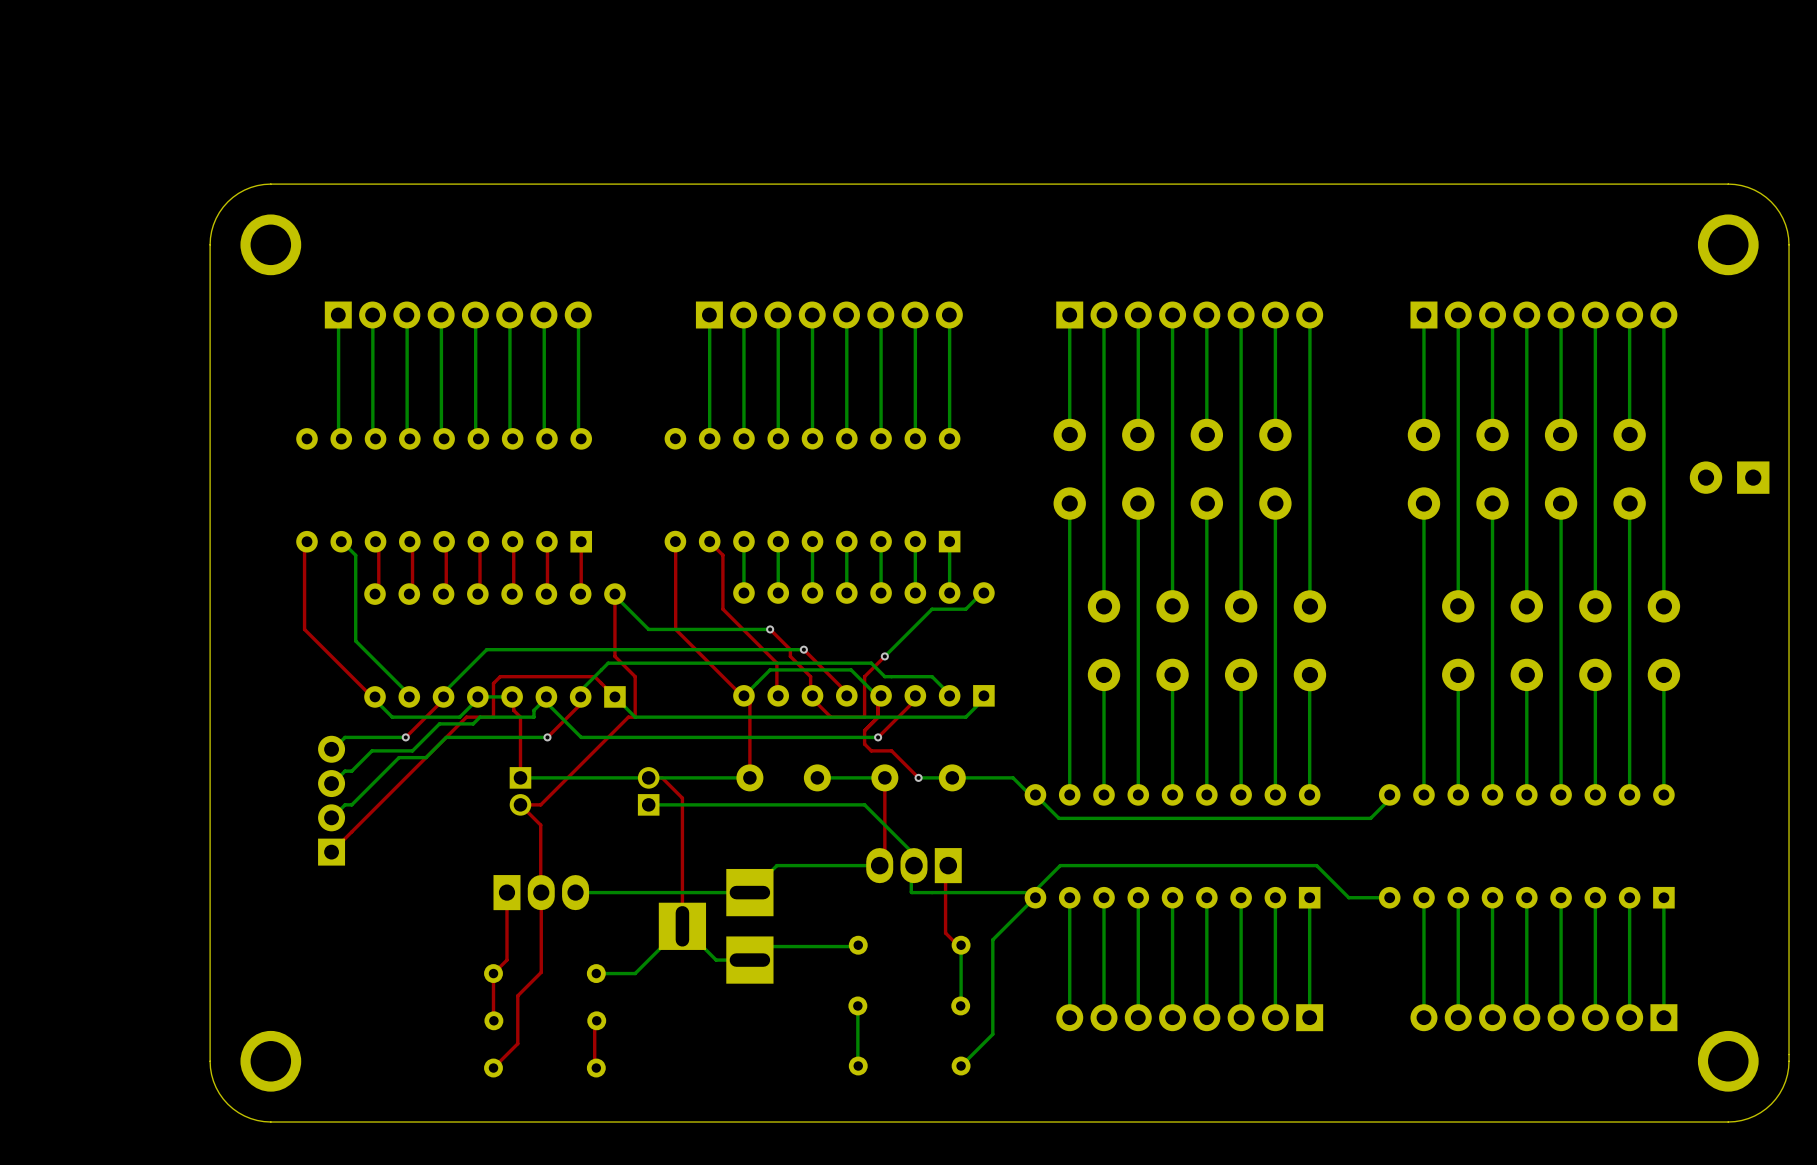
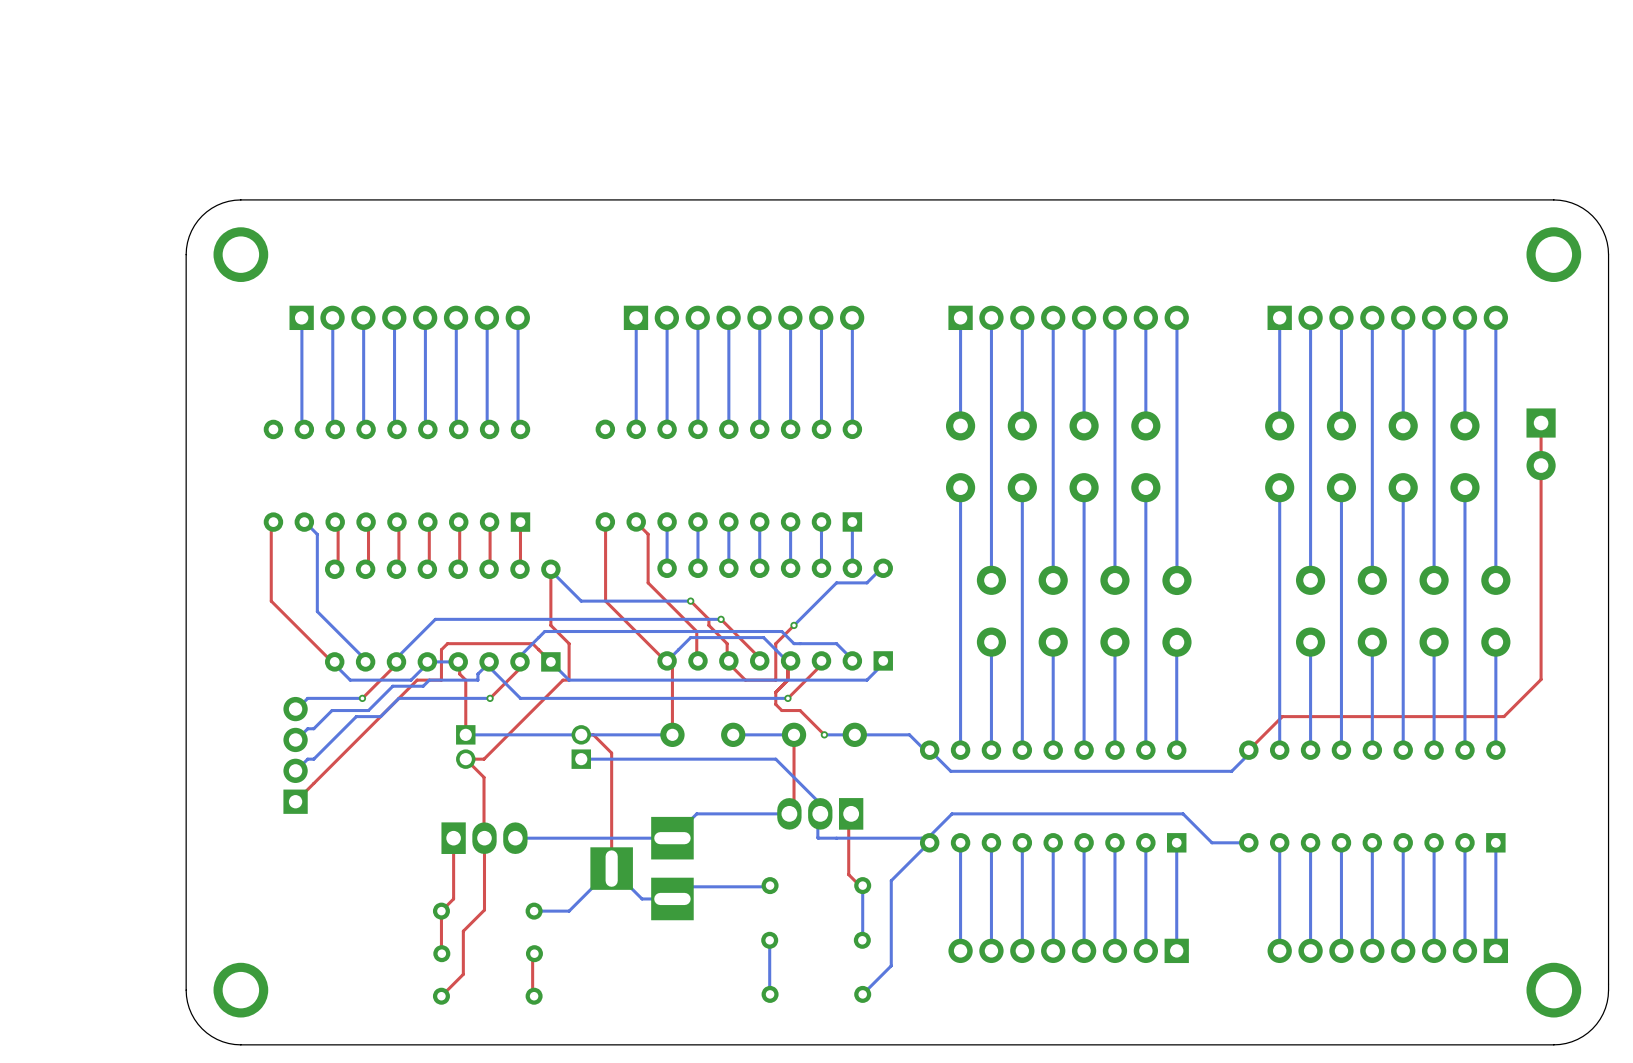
top track: none -> (1541, 423) (1541, 679) (1503, 716) (1282, 716) (1248, 750)
part rotation: 0° (1729, 477) -> 90° counterclockwise (1541, 444)

